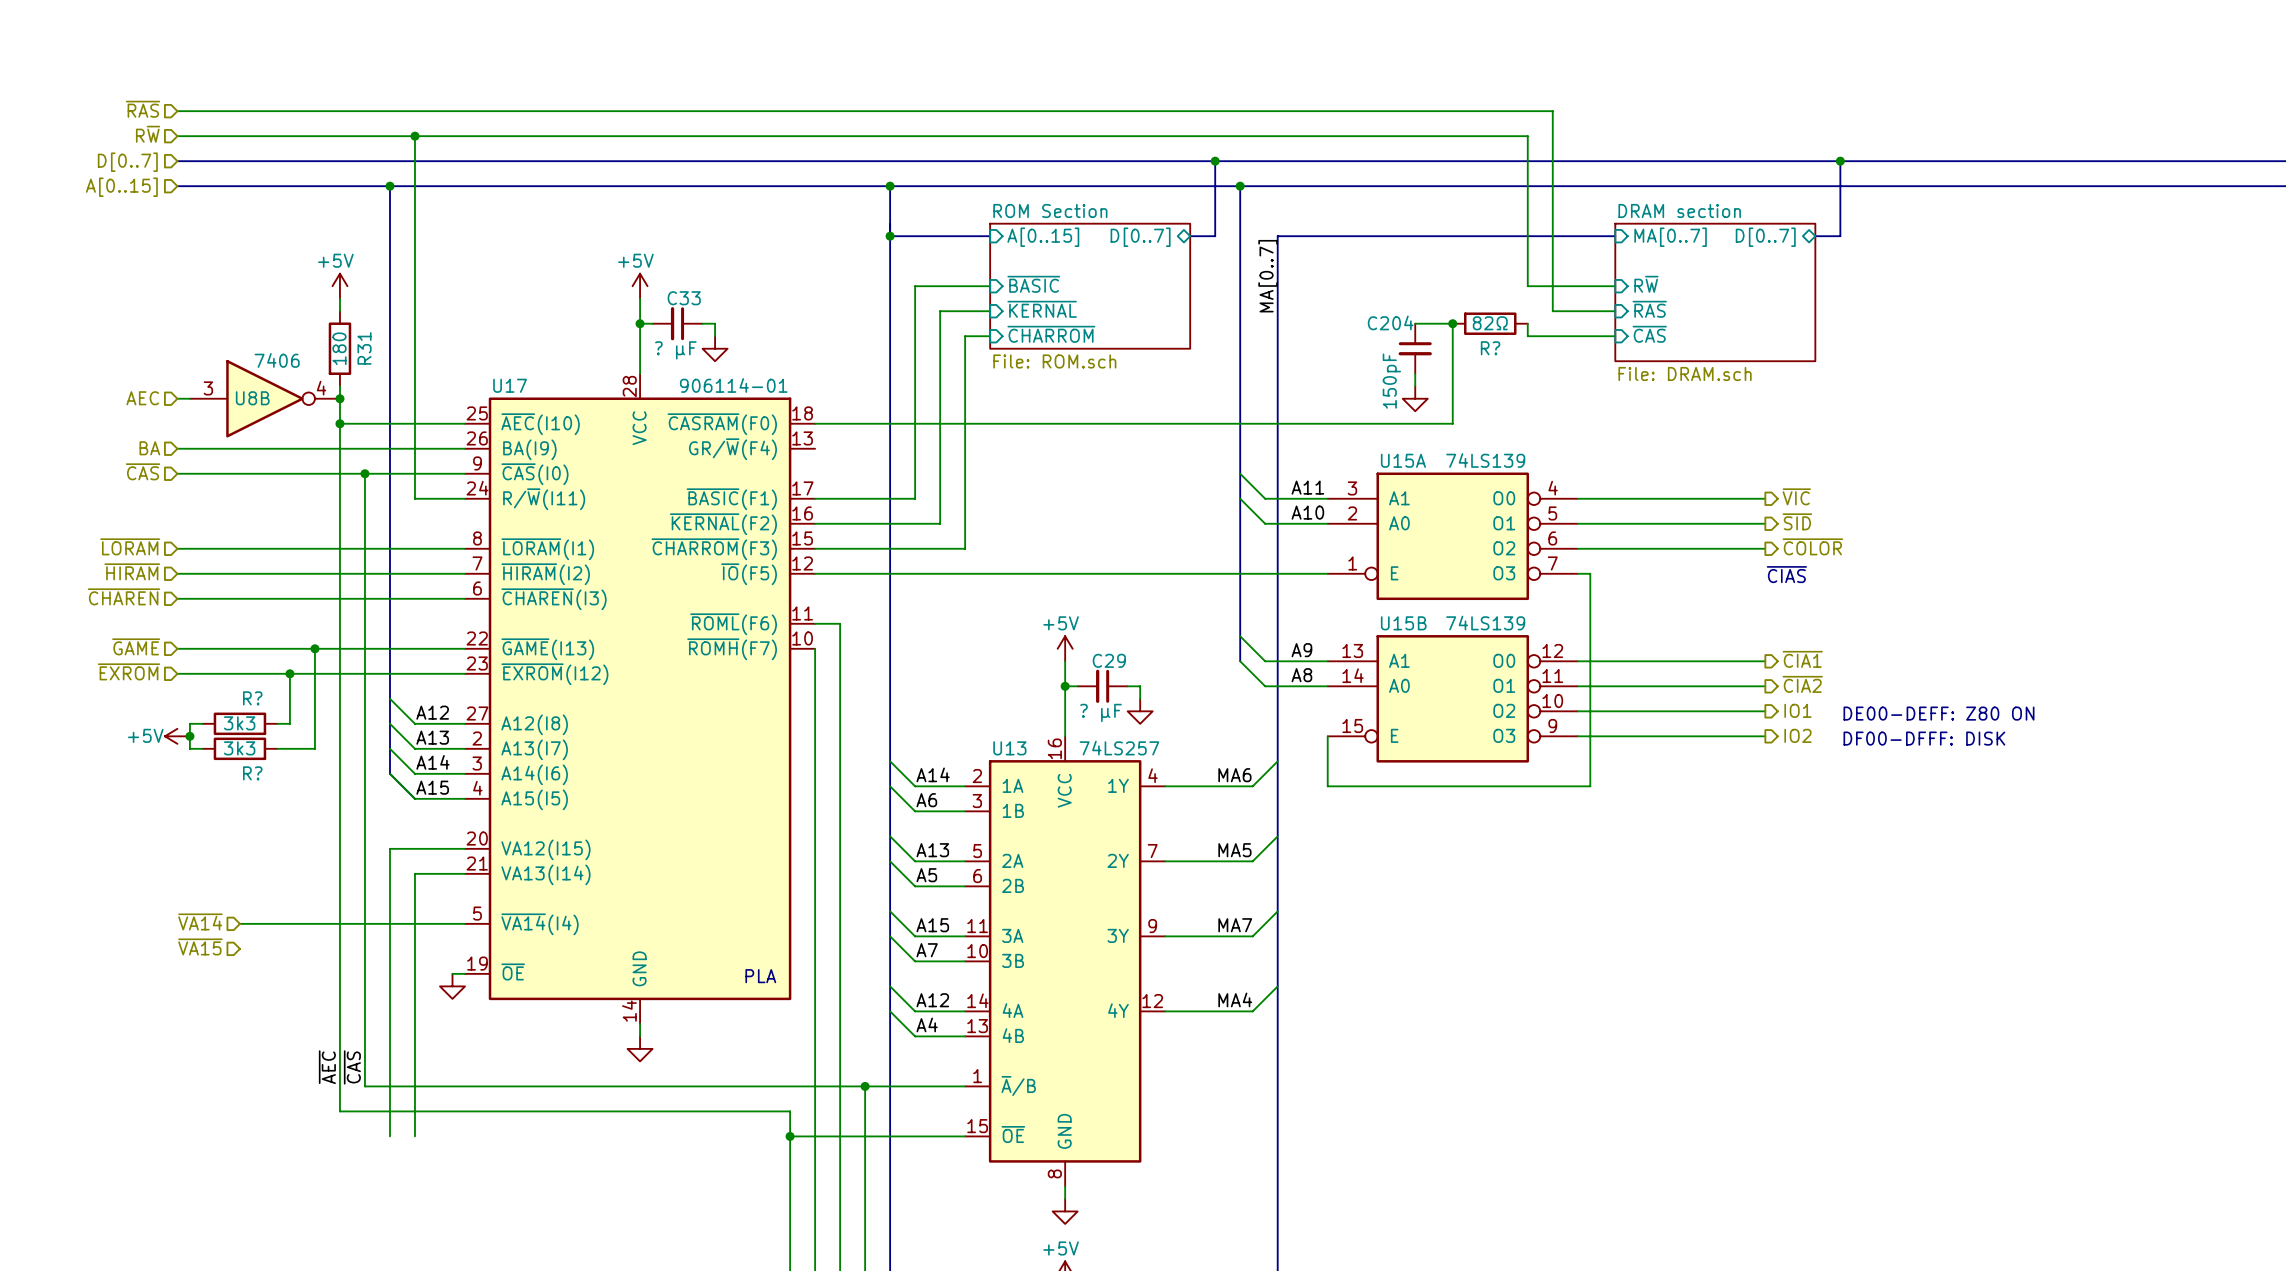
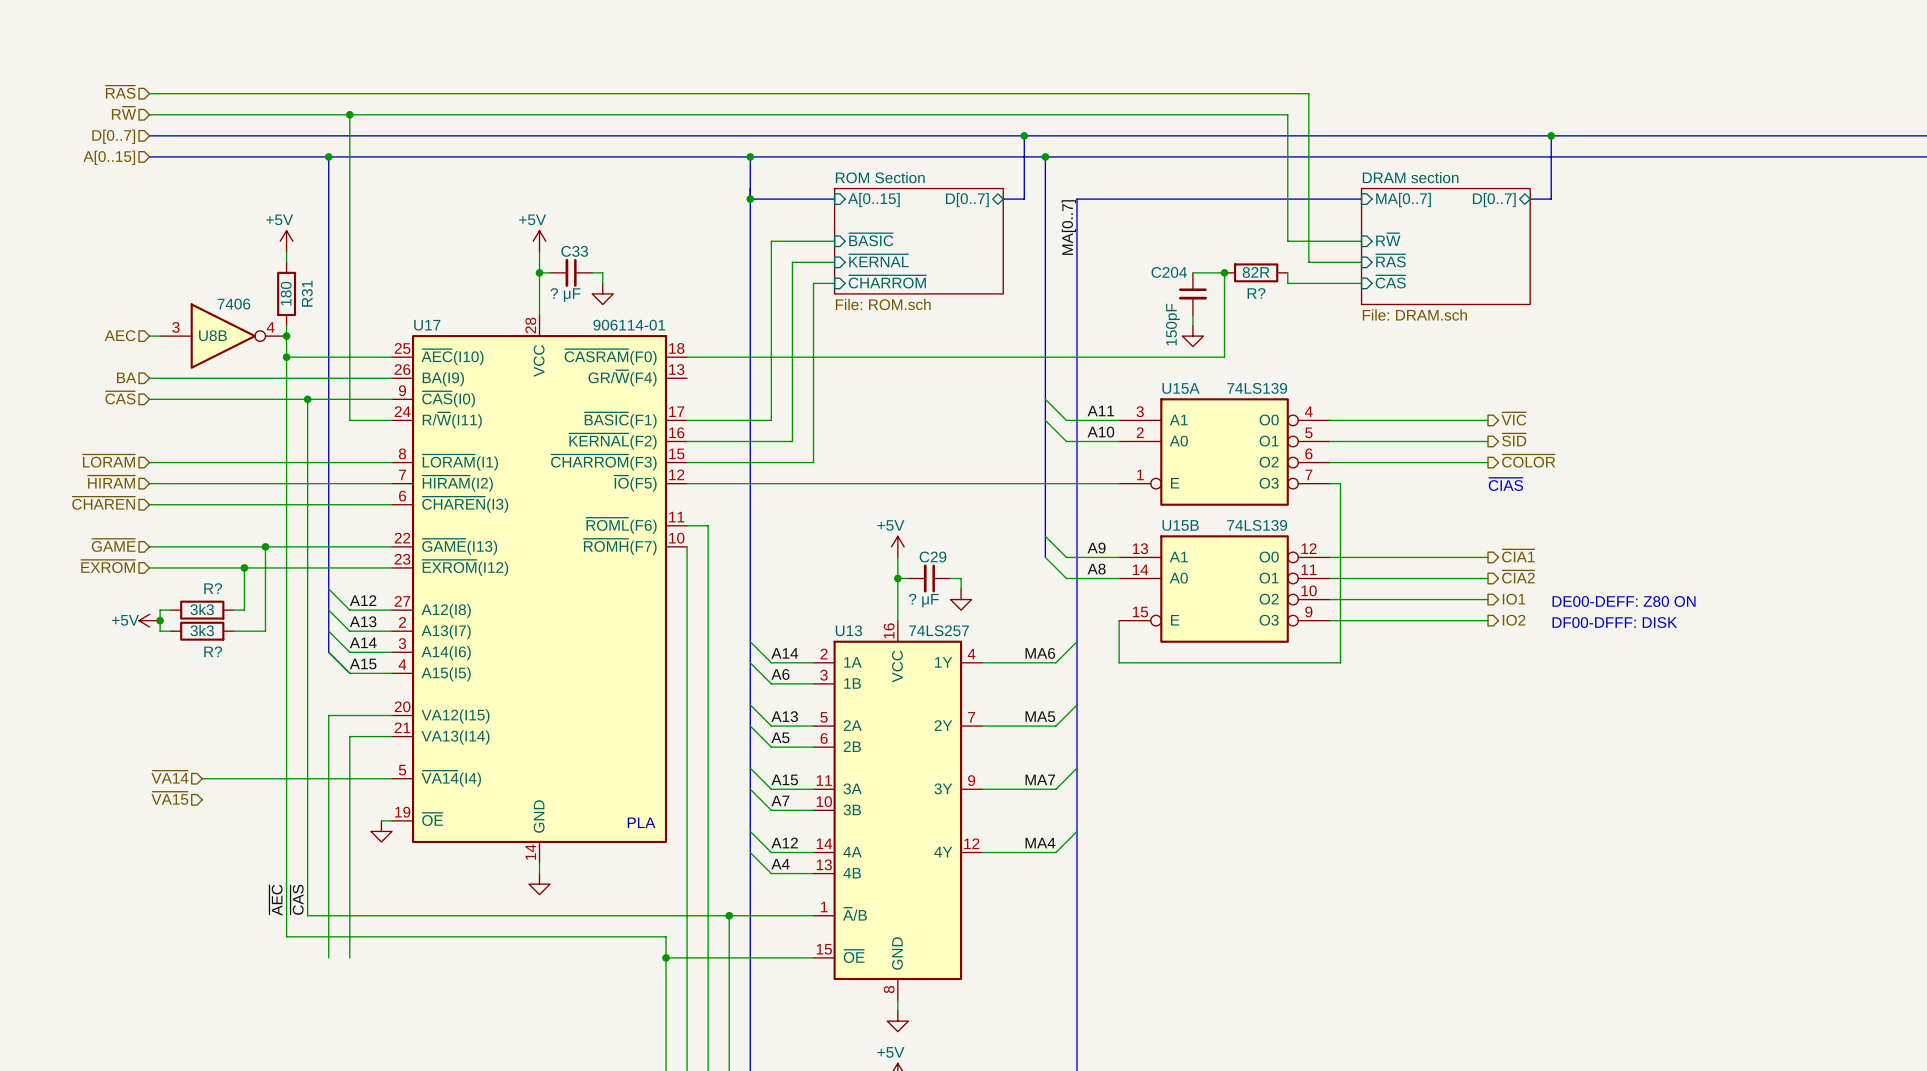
R? value: 82Ω (1490, 323) -> 82R (1256, 272)

